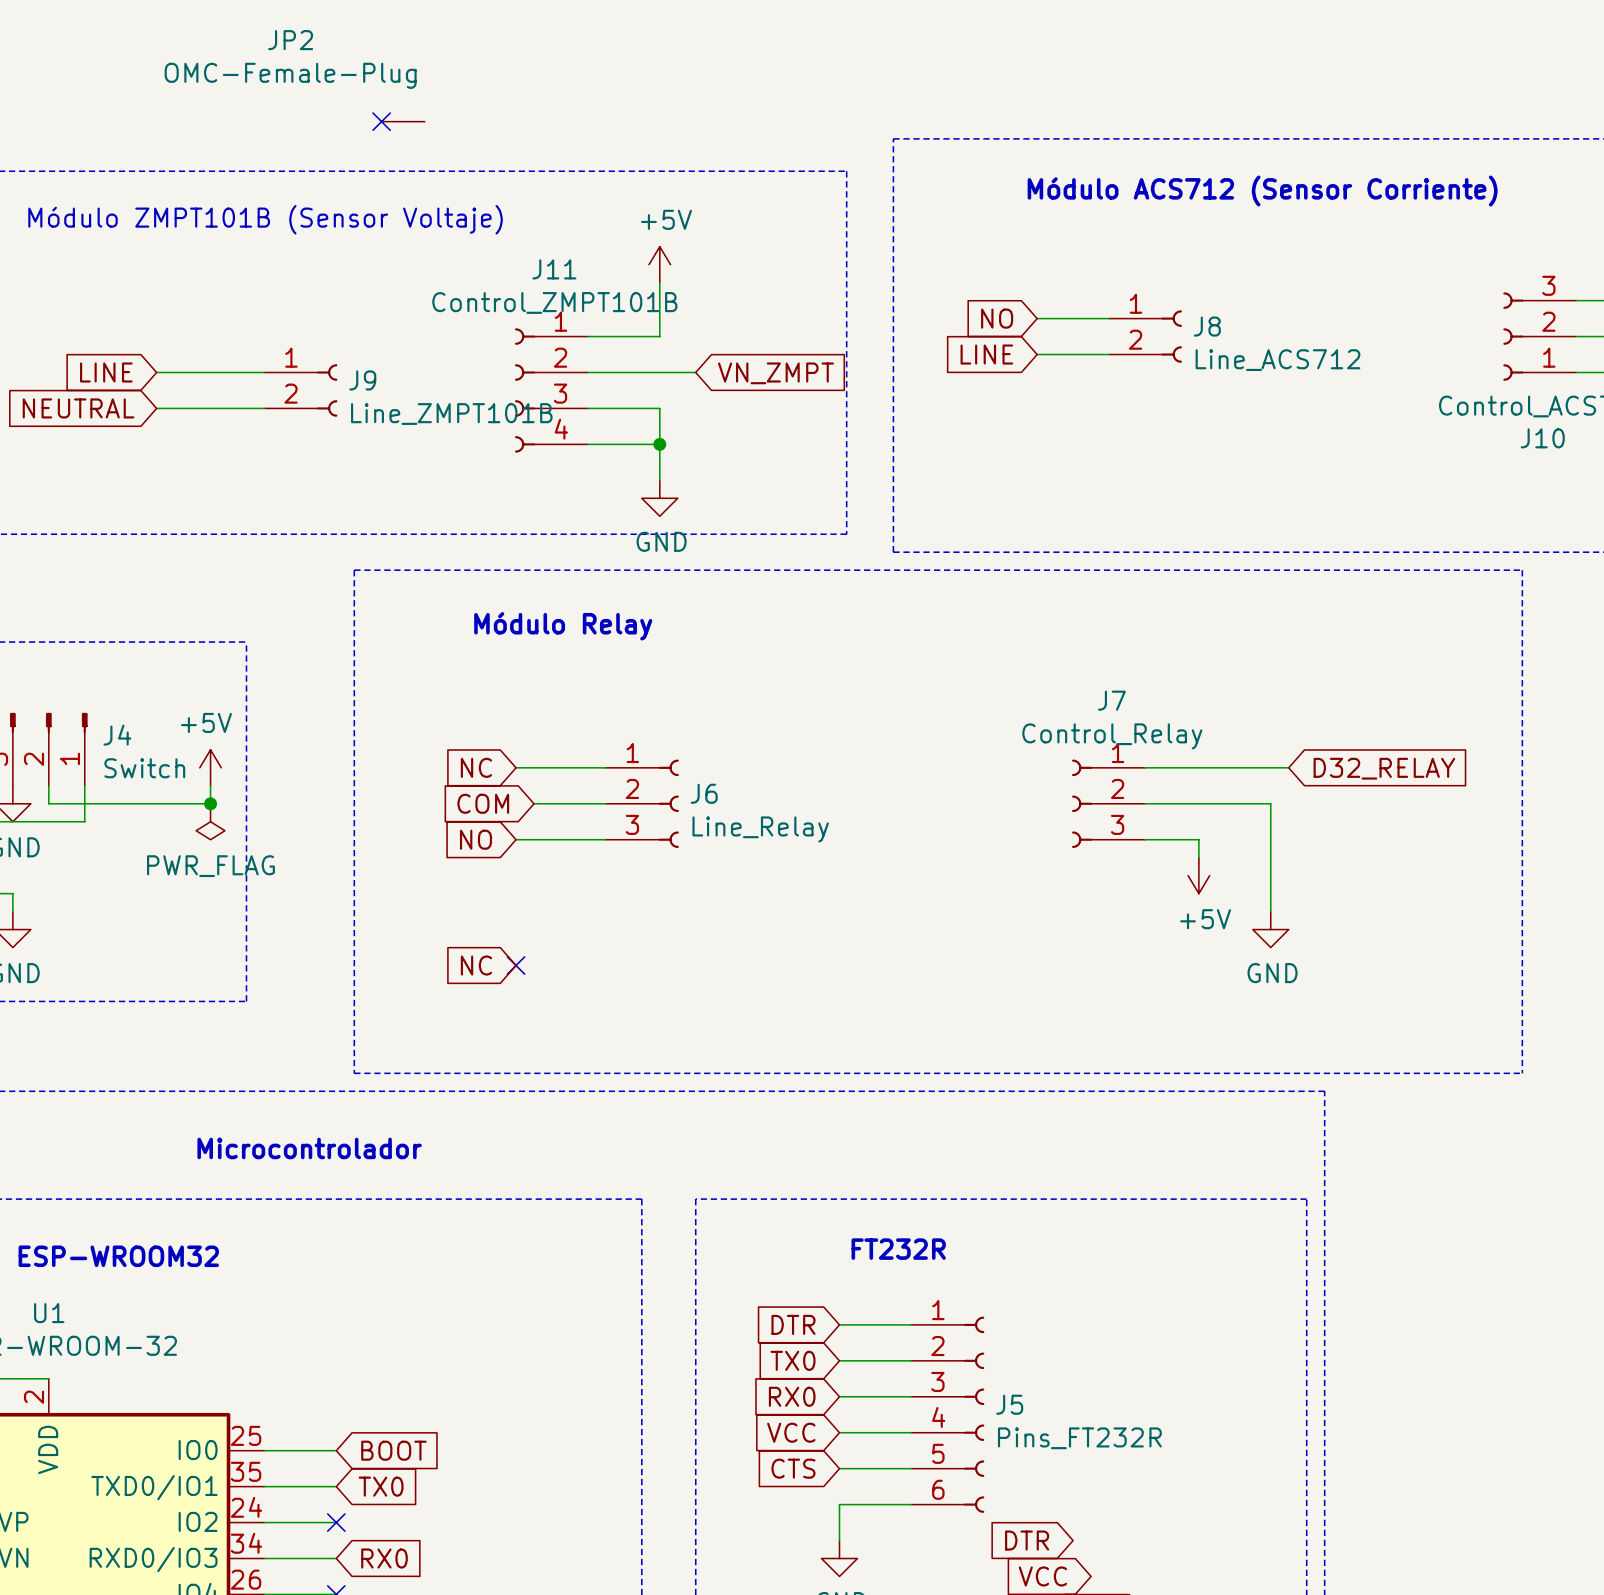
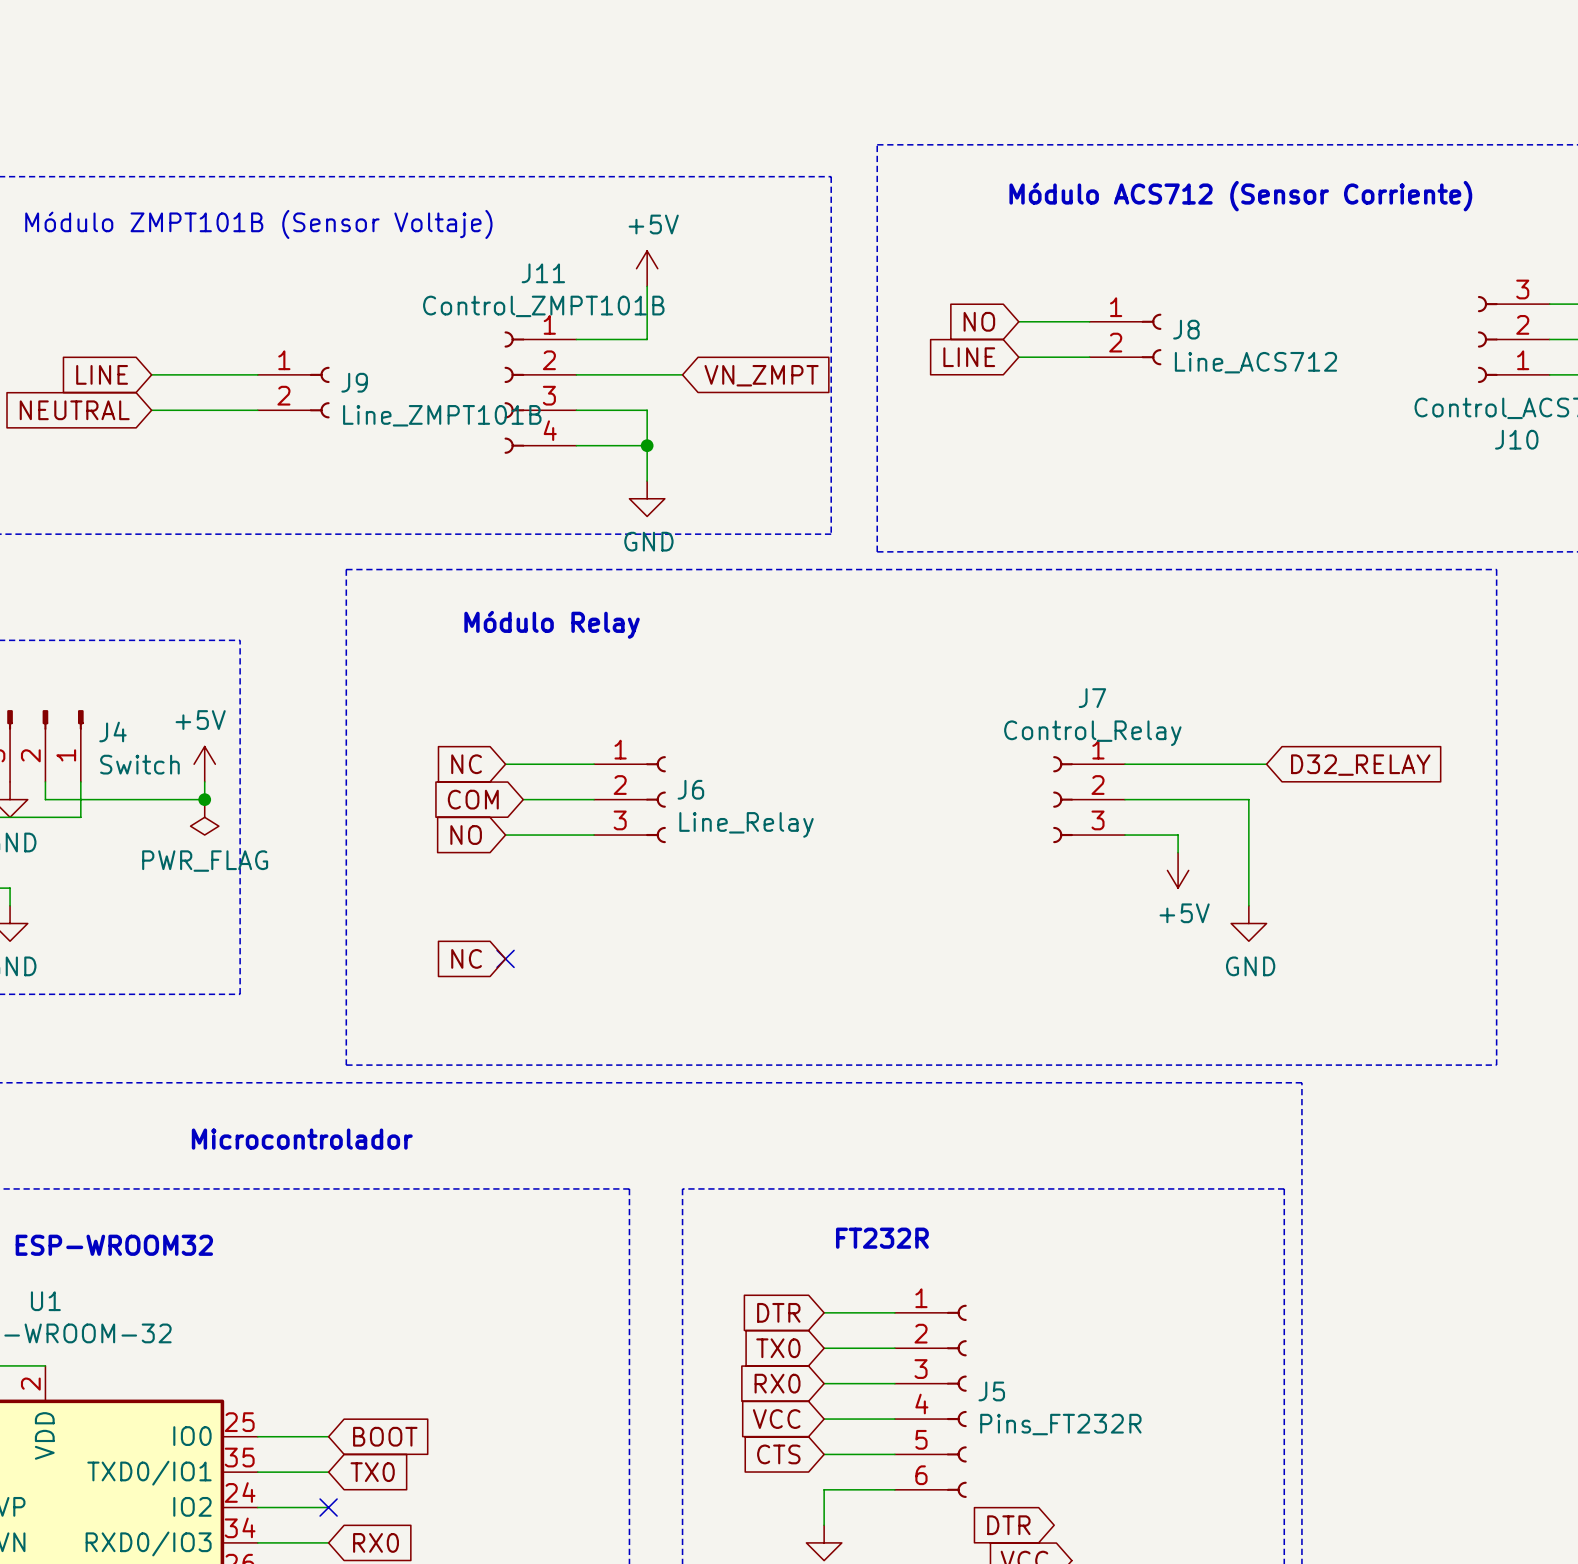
no-connect mark: (381, 121) -> none
JP2: OMC-Female-Plug (403, 121) -> none

